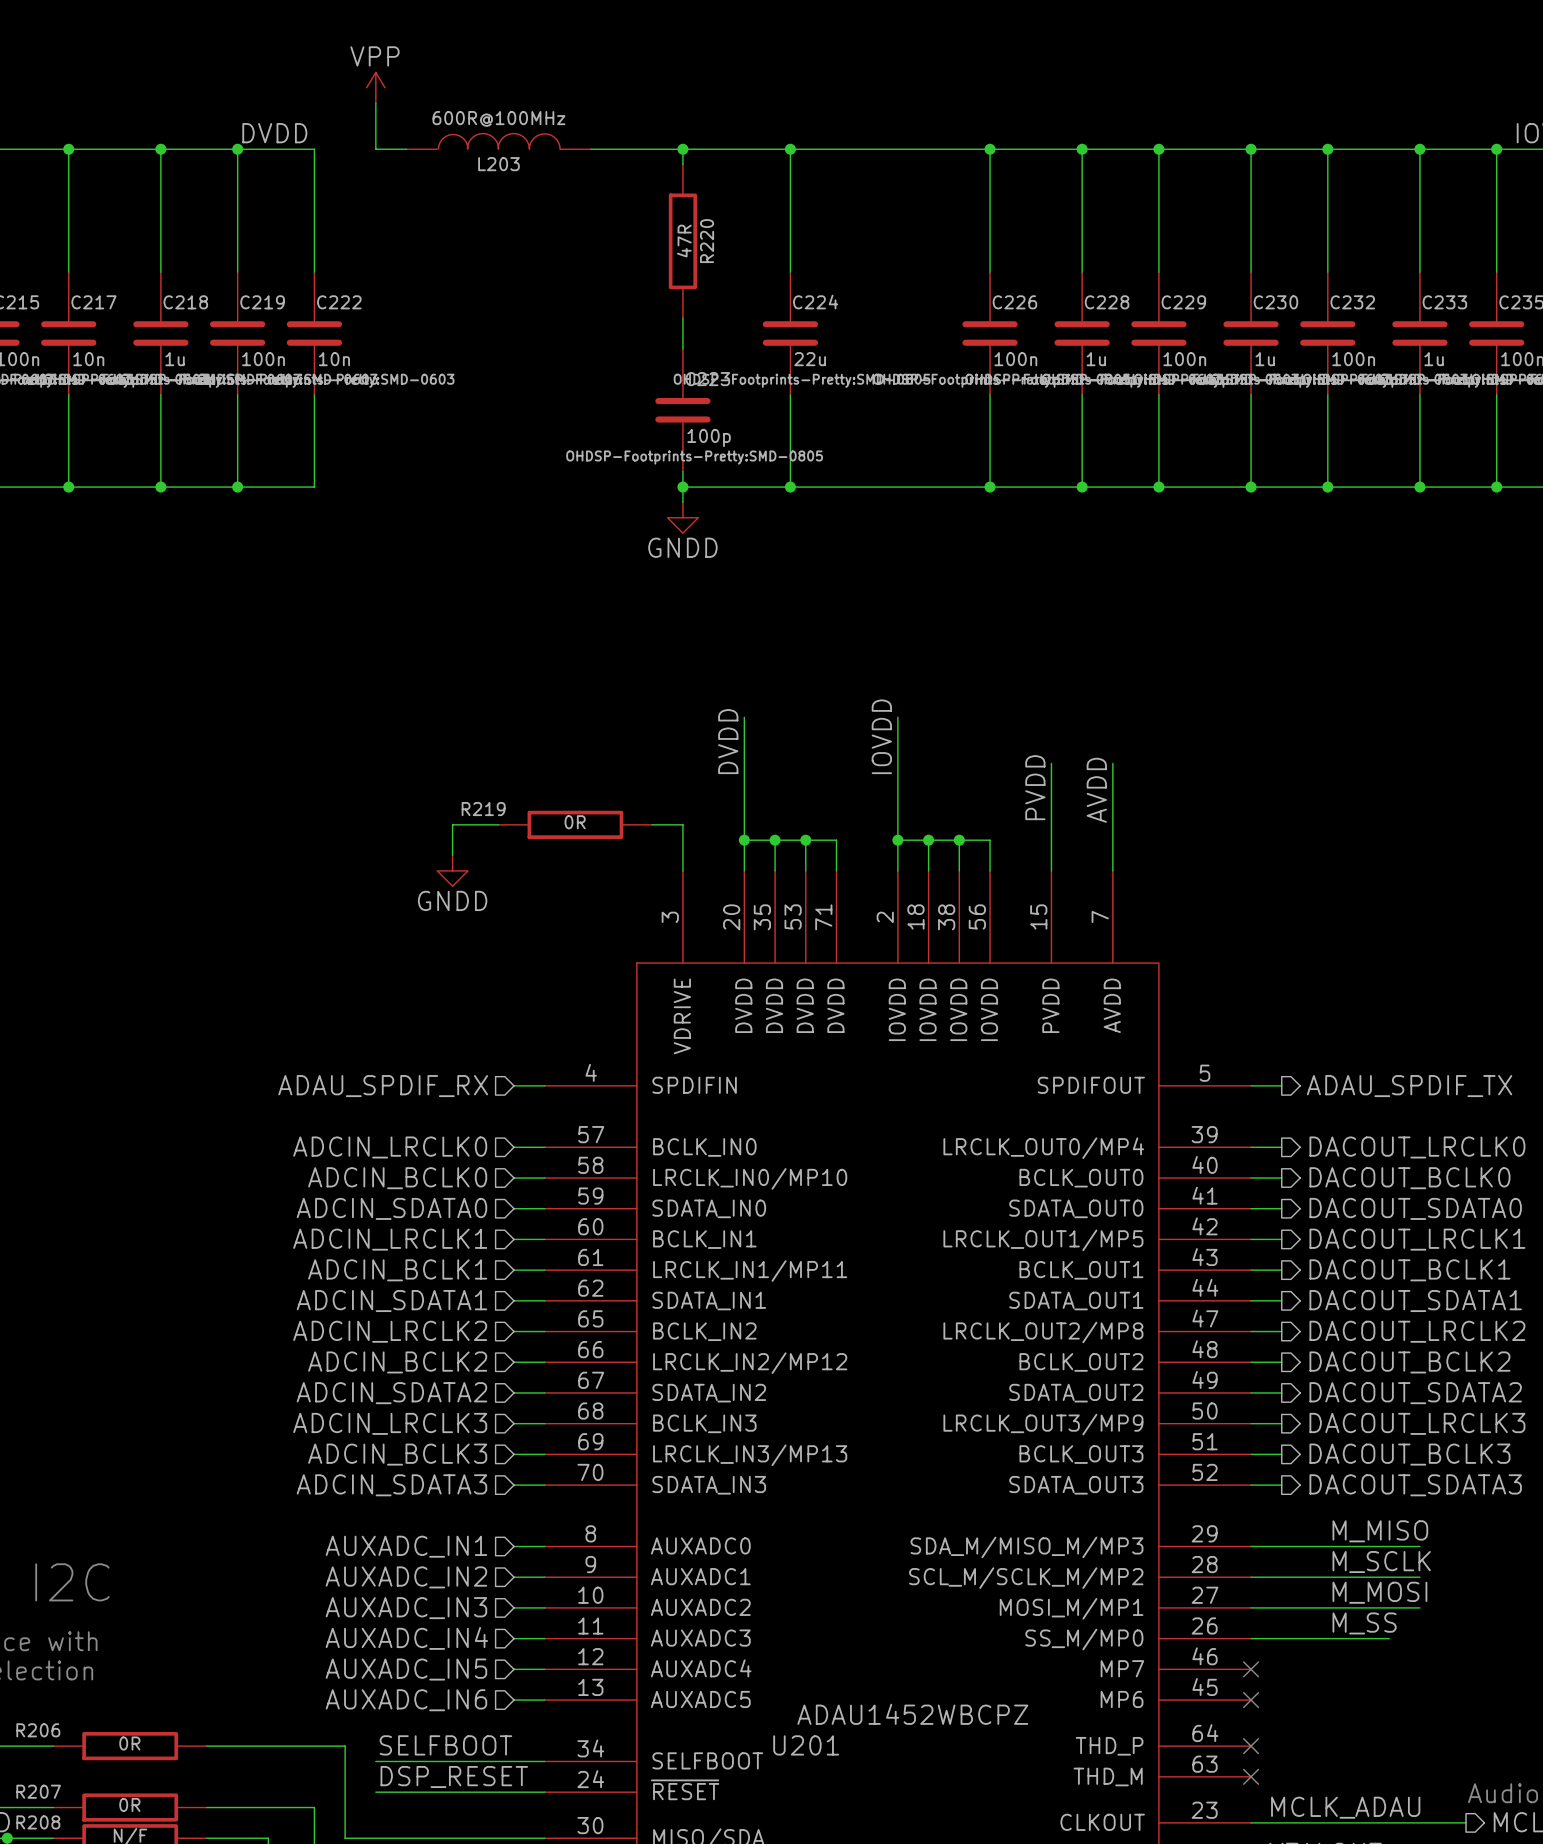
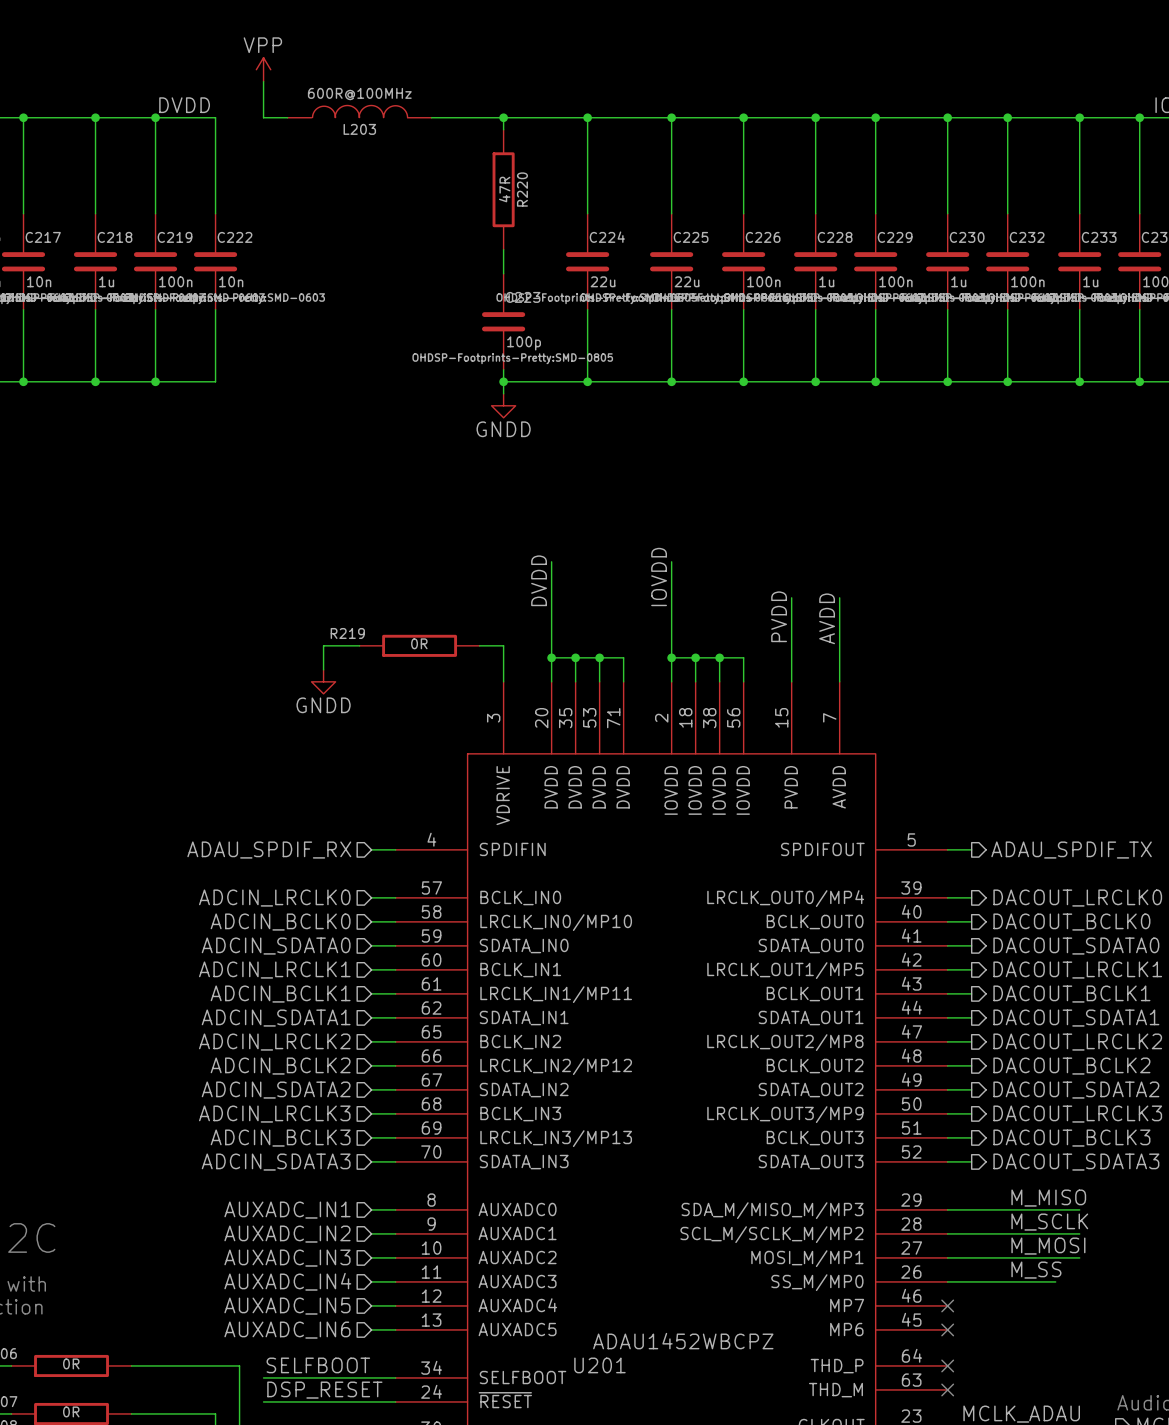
wire: none -> (671, 117) (671, 213)
junction: none -> (671, 117)
C225: none -> 22u (671, 261)
wire: none -> (671, 309) (671, 381)
junction: none -> (671, 381)

